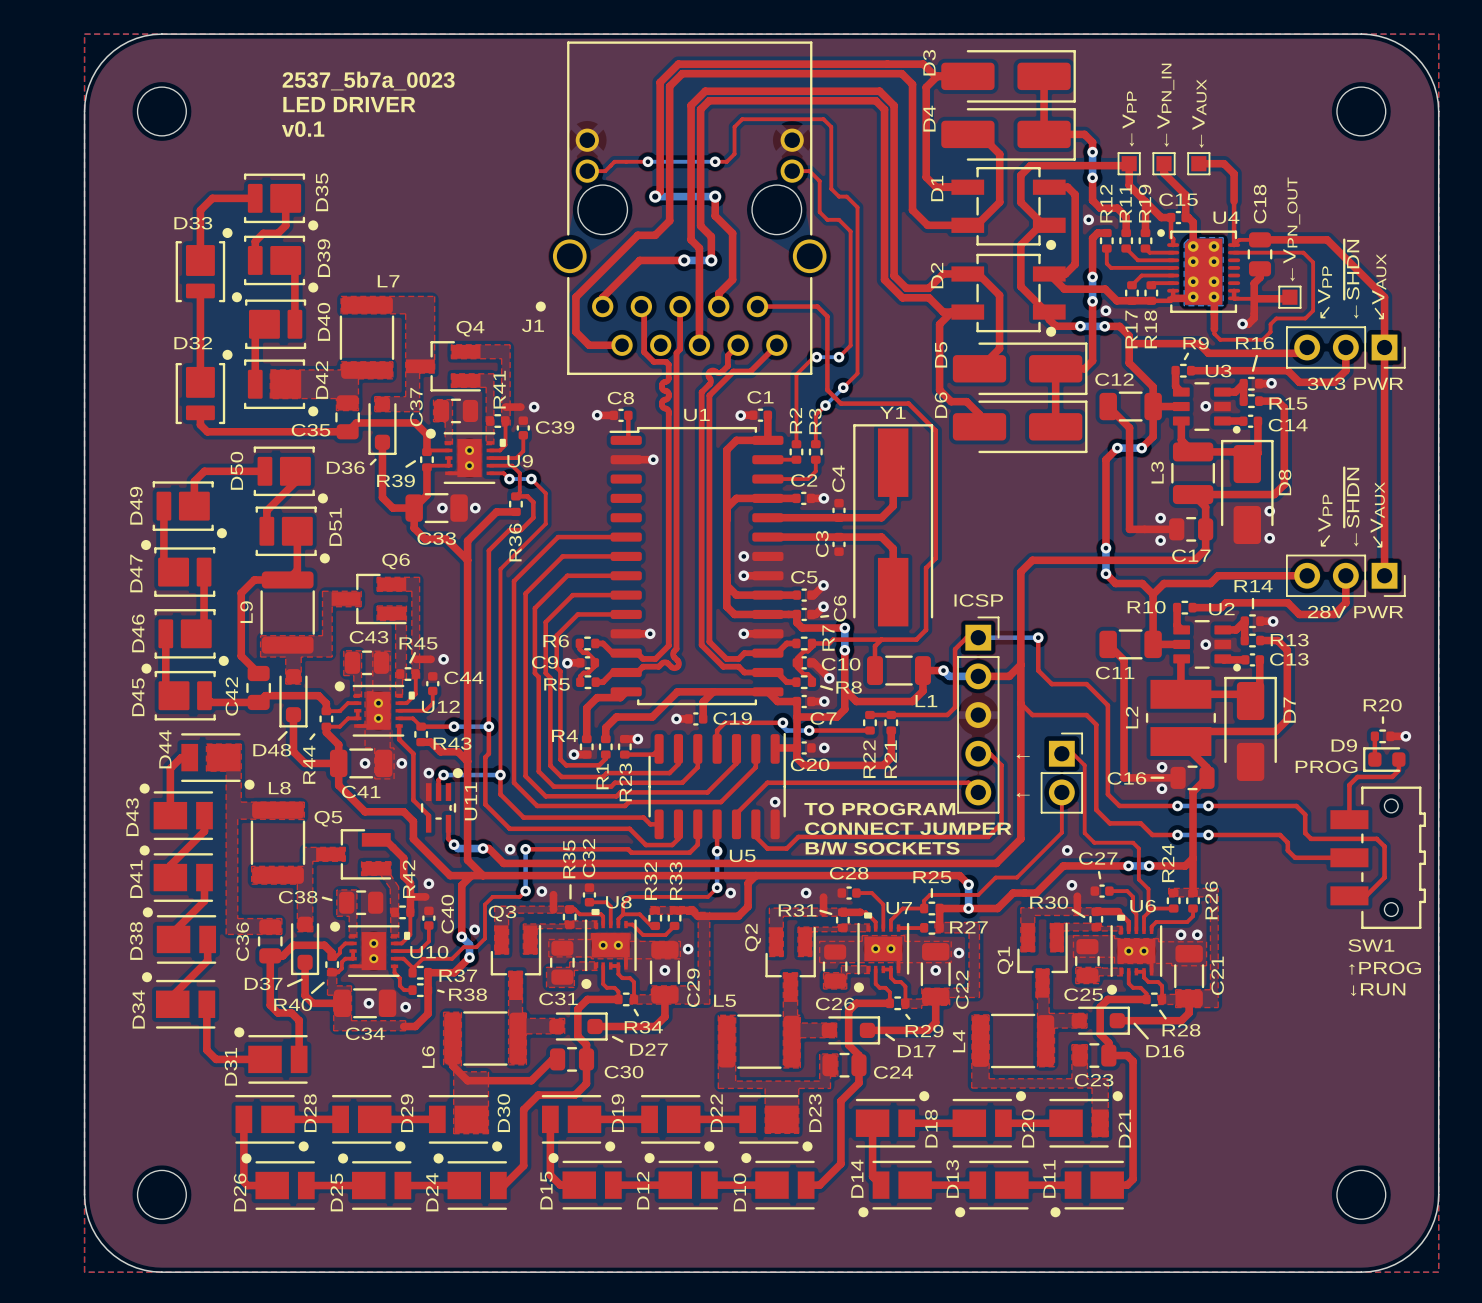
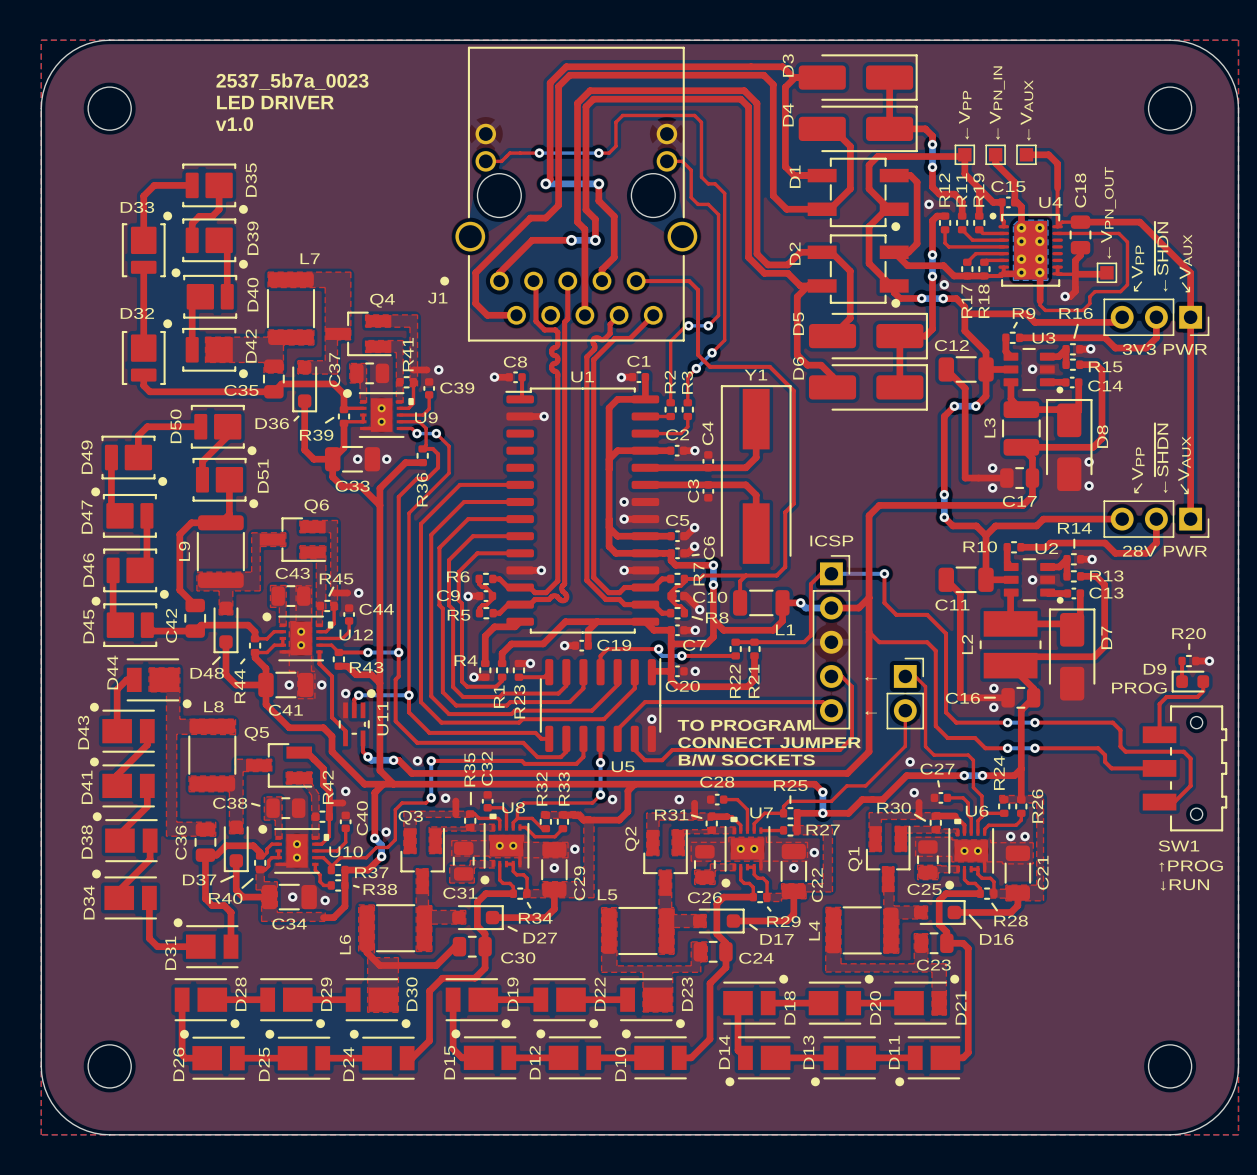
text: v0.1 (303, 129) -> v1.0 (234, 124)

